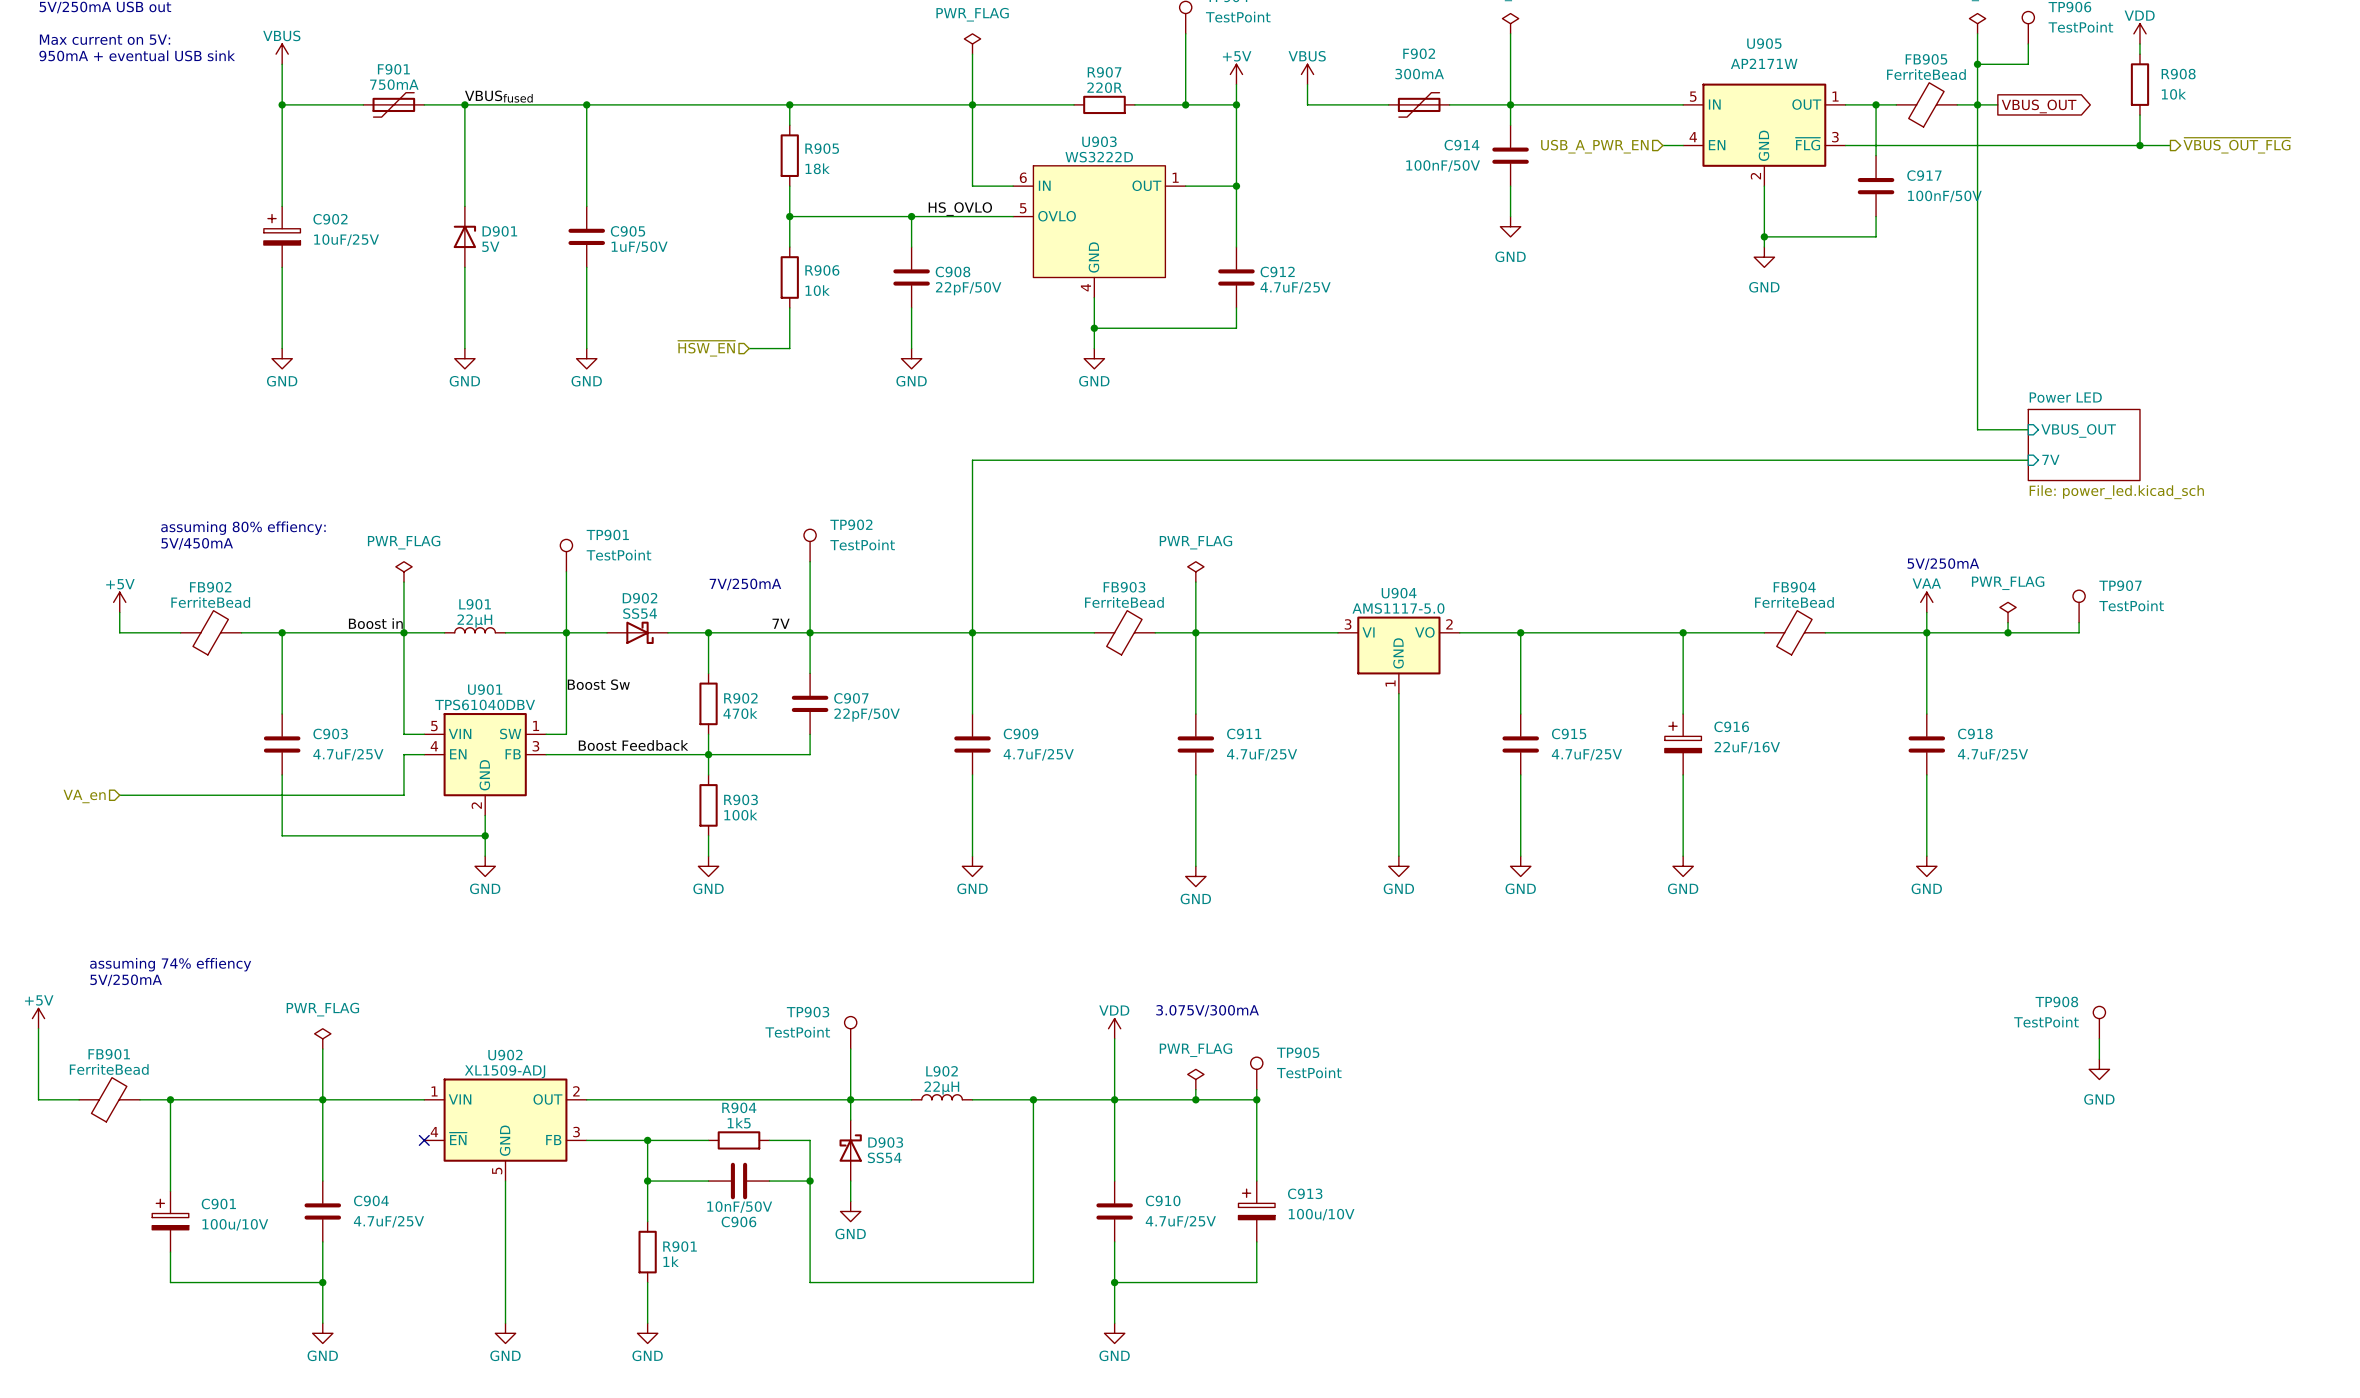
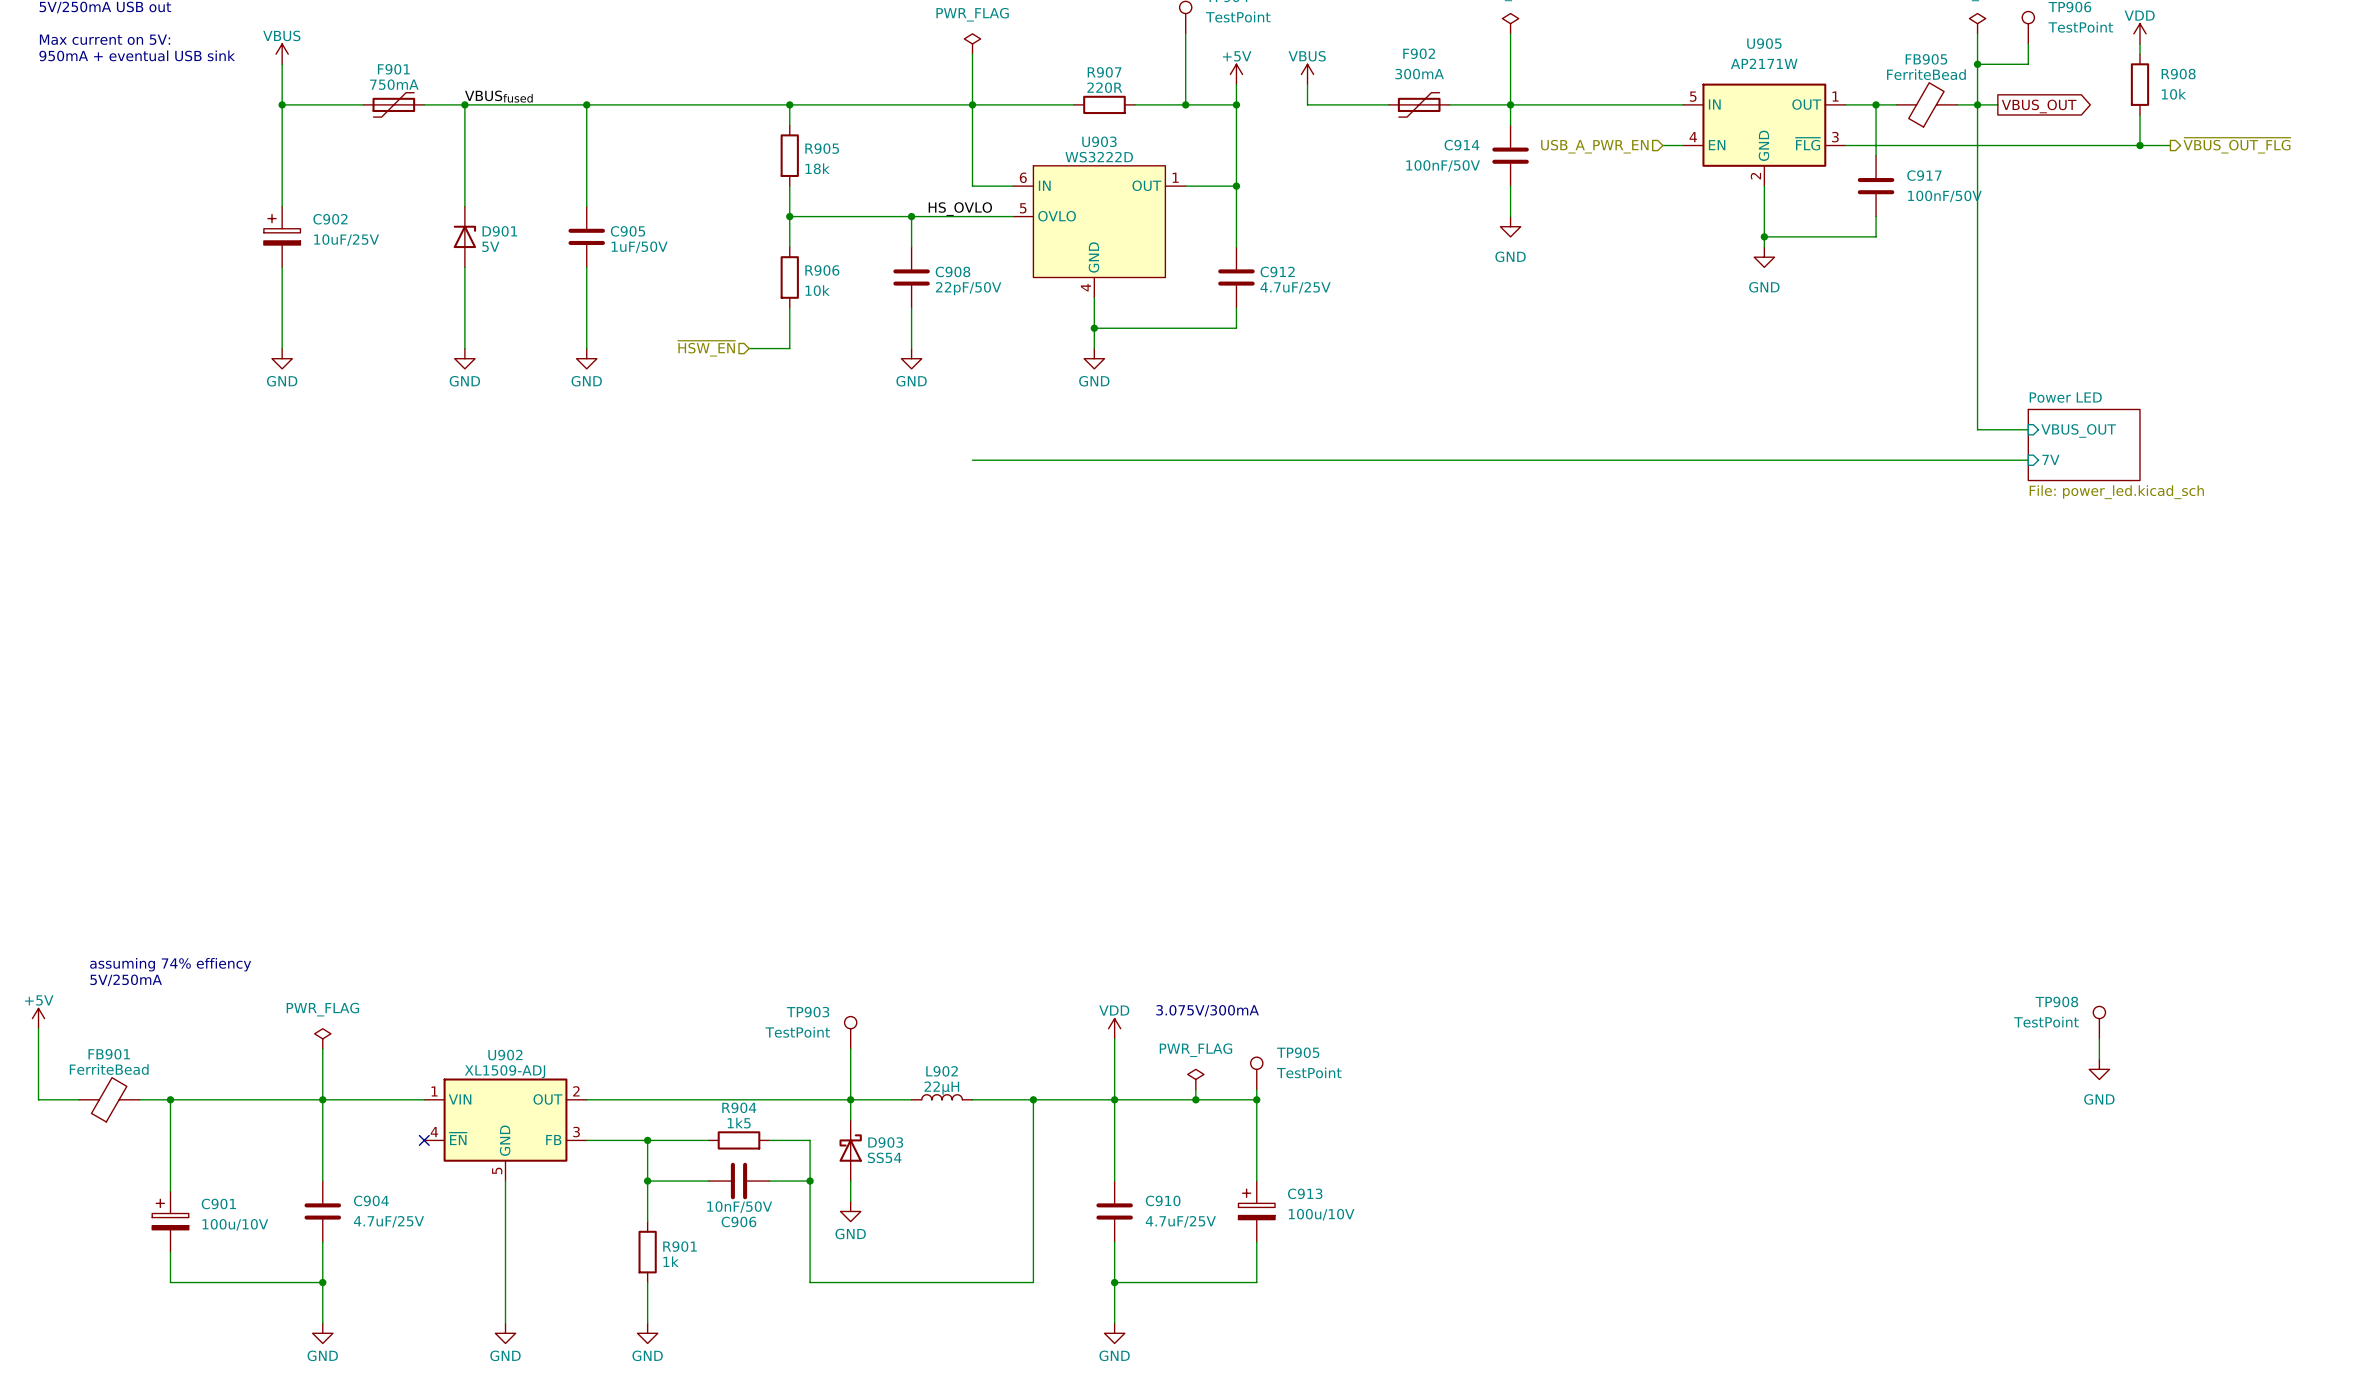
wire: (972, 460) (972, 714) -> none
text: assuming 80% effiency: (243, 528) -> none
text: 5V/450mA (197, 543) -> none
TP902: TestPoint (810, 545) -> none
TP901: TestPoint (566, 555) -> none
wire: (810, 561) (810, 673) -> none
text: 5V/250mA (1943, 564) -> none
power symbol: PWR_FLAG (403, 571) -> none
wire: (566, 571) (566, 734) (546, 734) -> none
power symbol: PWR_FLAG (1195, 571) -> none
wire: (403, 582) (403, 734) (424, 734) -> none
wire: (1195, 582) (1195, 714) -> none
text: 7V/250mA (745, 584) -> none
power symbol: +5V (119, 602) -> none
power symbol: VAA (1926, 602) -> none
TP907: TestPoint (2079, 606) -> none
wire: (119, 612) (119, 632) (180, 632) -> none
wire: (1926, 612) (1926, 714) -> none
power symbol: PWR_FLAG (2008, 612) -> none
wire: (2008, 622) (2008, 632) -> none
wire: (2079, 622) (2079, 632) (1825, 632) -> none
label: Boost in (375, 623) -> none
label: 7V (781, 623) -> none
L901: 22µH (475, 630) -> none
FB902: FerriteBead (211, 632) -> none
wire: (241, 632) (444, 632) -> none
wire: (282, 632) (282, 714) -> none
junction: (282, 632) -> none
junction: (403, 632) -> none
wire: (505, 632) (607, 632) -> none
junction: (566, 632) -> none
D902: SS54 (637, 632) -> none
wire: (667, 632) (1094, 632) -> none
wire: (708, 632) (708, 673) -> none
junction: (708, 632) -> none
junction: (810, 632) -> none
junction: (972, 632) -> none
FB903: FerriteBead (1124, 632) -> none
wire: (1155, 632) (1337, 632) -> none
junction: (1195, 632) -> none
wire: (1459, 632) (1764, 632) -> none
wire: (1520, 632) (1520, 714) -> none
junction: (1520, 632) -> none
wire: (1683, 632) (1683, 714) -> none
junction: (1683, 632) -> none
FB904: FerriteBead (1794, 632) -> none
junction: (1926, 632) -> none
junction: (2008, 632) -> none
U904: AMS1117-5.0 (1398, 655) -> none
label: Boost Sw (598, 684) -> none
wire: (1398, 693) (1398, 856) -> none
R902: 470k (708, 703) -> none
C907: 22pF/50V (810, 703) -> none
wire: (708, 734) (708, 774) -> none
wire: (810, 734) (810, 754) (546, 754) -> none
C903: 4.7uF/25V (282, 744) -> none
C909: 4.7uF/25V (972, 744) -> none
C911: 4.7uF/25V (1195, 744) -> none
C915: 4.7uF/25V (1520, 744) -> none
C916: 22uF/16V (1683, 744) -> none
C918: 4.7uF/25V (1926, 744) -> none
label: Boost Feedback (633, 745) -> none
wire: (424, 754) (403, 754) (403, 795) (119, 795) -> none
junction: (708, 754) -> none
U901: TPS61040DBV (485, 764) -> none
wire: (282, 774) (282, 835) (485, 835) -> none
wire: (972, 774) (972, 856) -> none
wire: (1195, 774) (1195, 866) -> none
wire: (1520, 774) (1520, 856) -> none
wire: (1683, 774) (1683, 856) -> none
wire: (1926, 774) (1926, 856) -> none
hierarchical label: VA_en (84, 796) -> none
R903: 100k (708, 805) -> none
wire: (485, 815) (485, 856) -> none
junction: (485, 835) -> none
wire: (708, 835) (708, 856) -> none
power symbol: GND (485, 866) -> none
power symbol: GND (708, 866) -> none
power symbol: GND (972, 866) -> none
power symbol: GND (1398, 866) -> none
power symbol: GND (1520, 866) -> none
power symbol: GND (1683, 866) -> none
power symbol: GND (1926, 866) -> none
power symbol: GND (1195, 876) -> none

